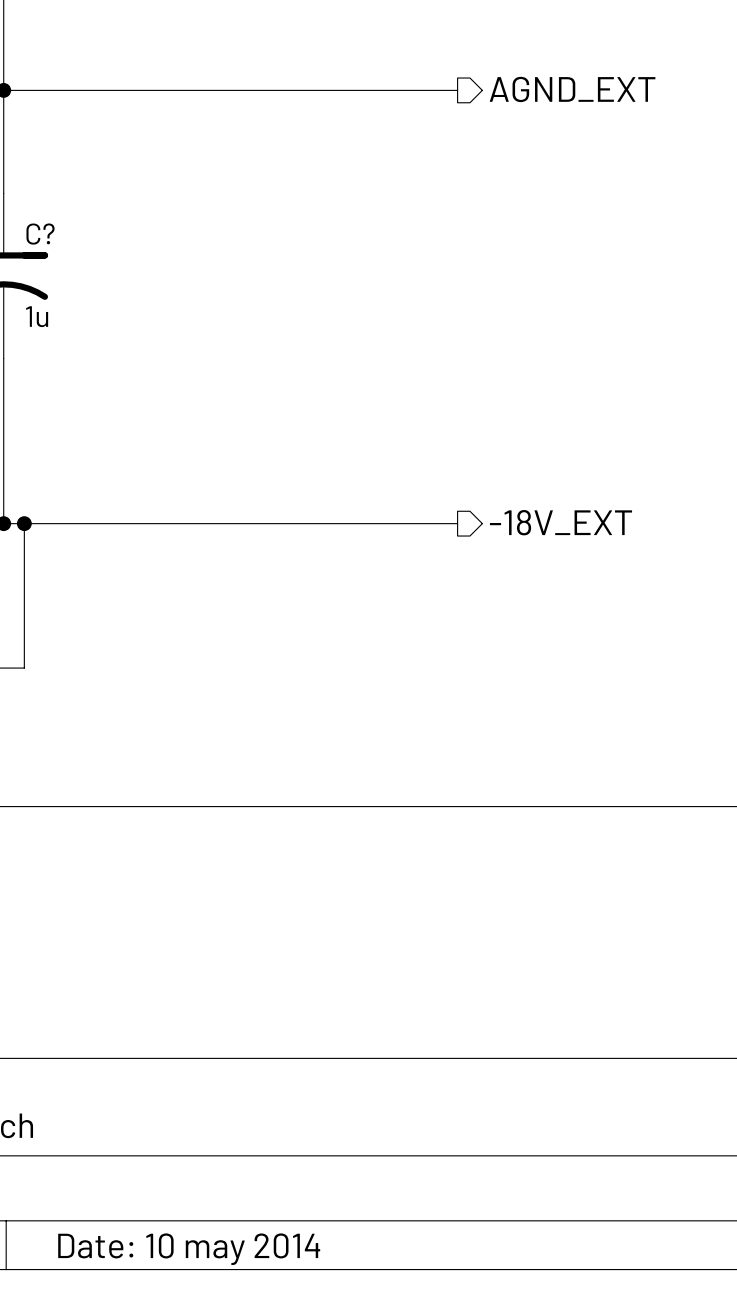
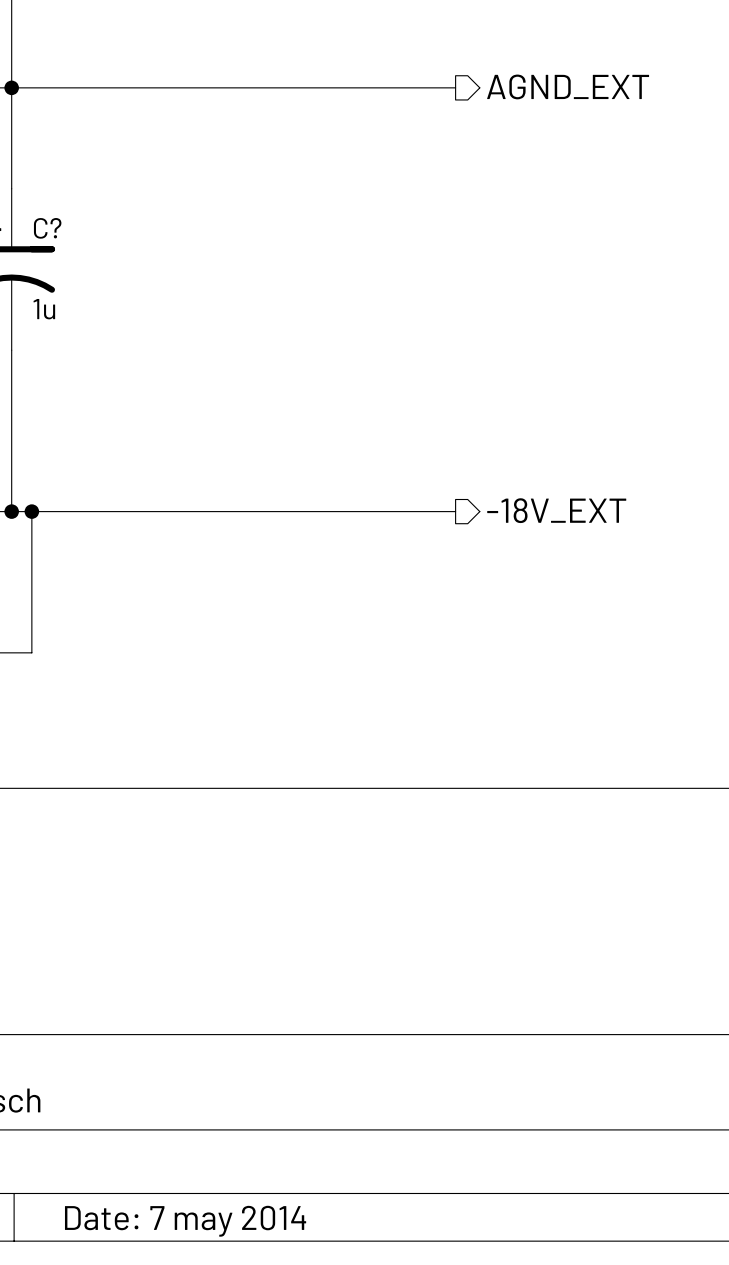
title block: Date: 10 may 2014 (189, 1249) -> Date: 7 may 2014 (185, 1221)

